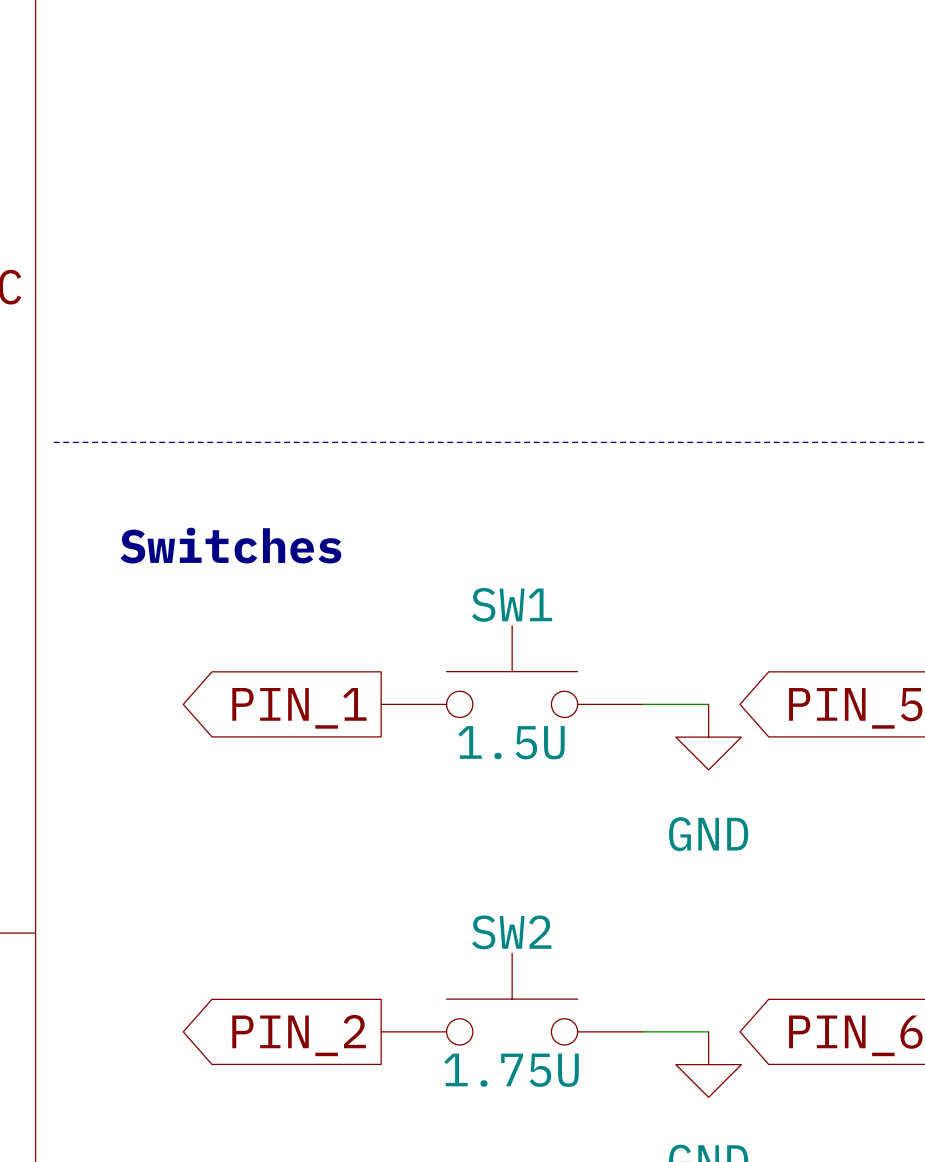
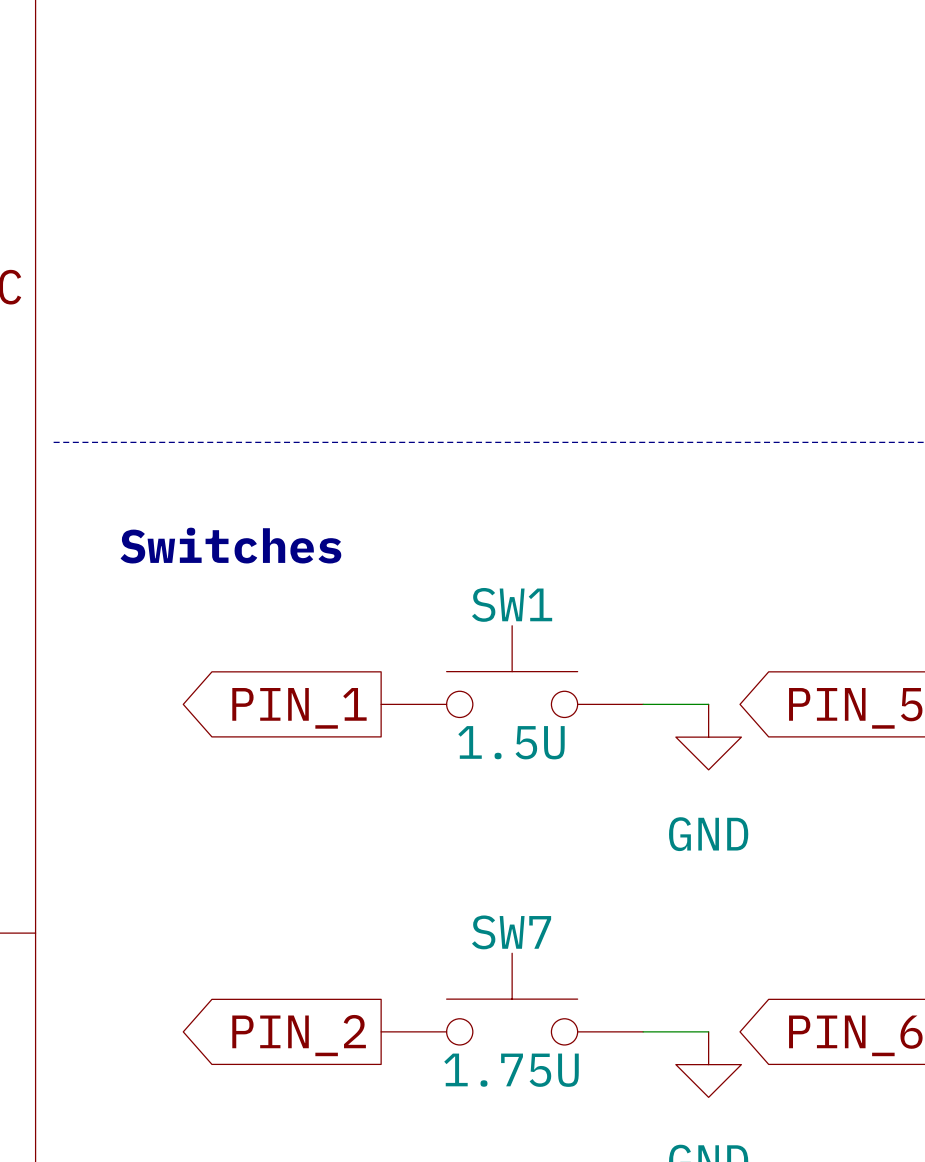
SW2 name: SW2 (511, 932) -> SW7 (511, 932)

